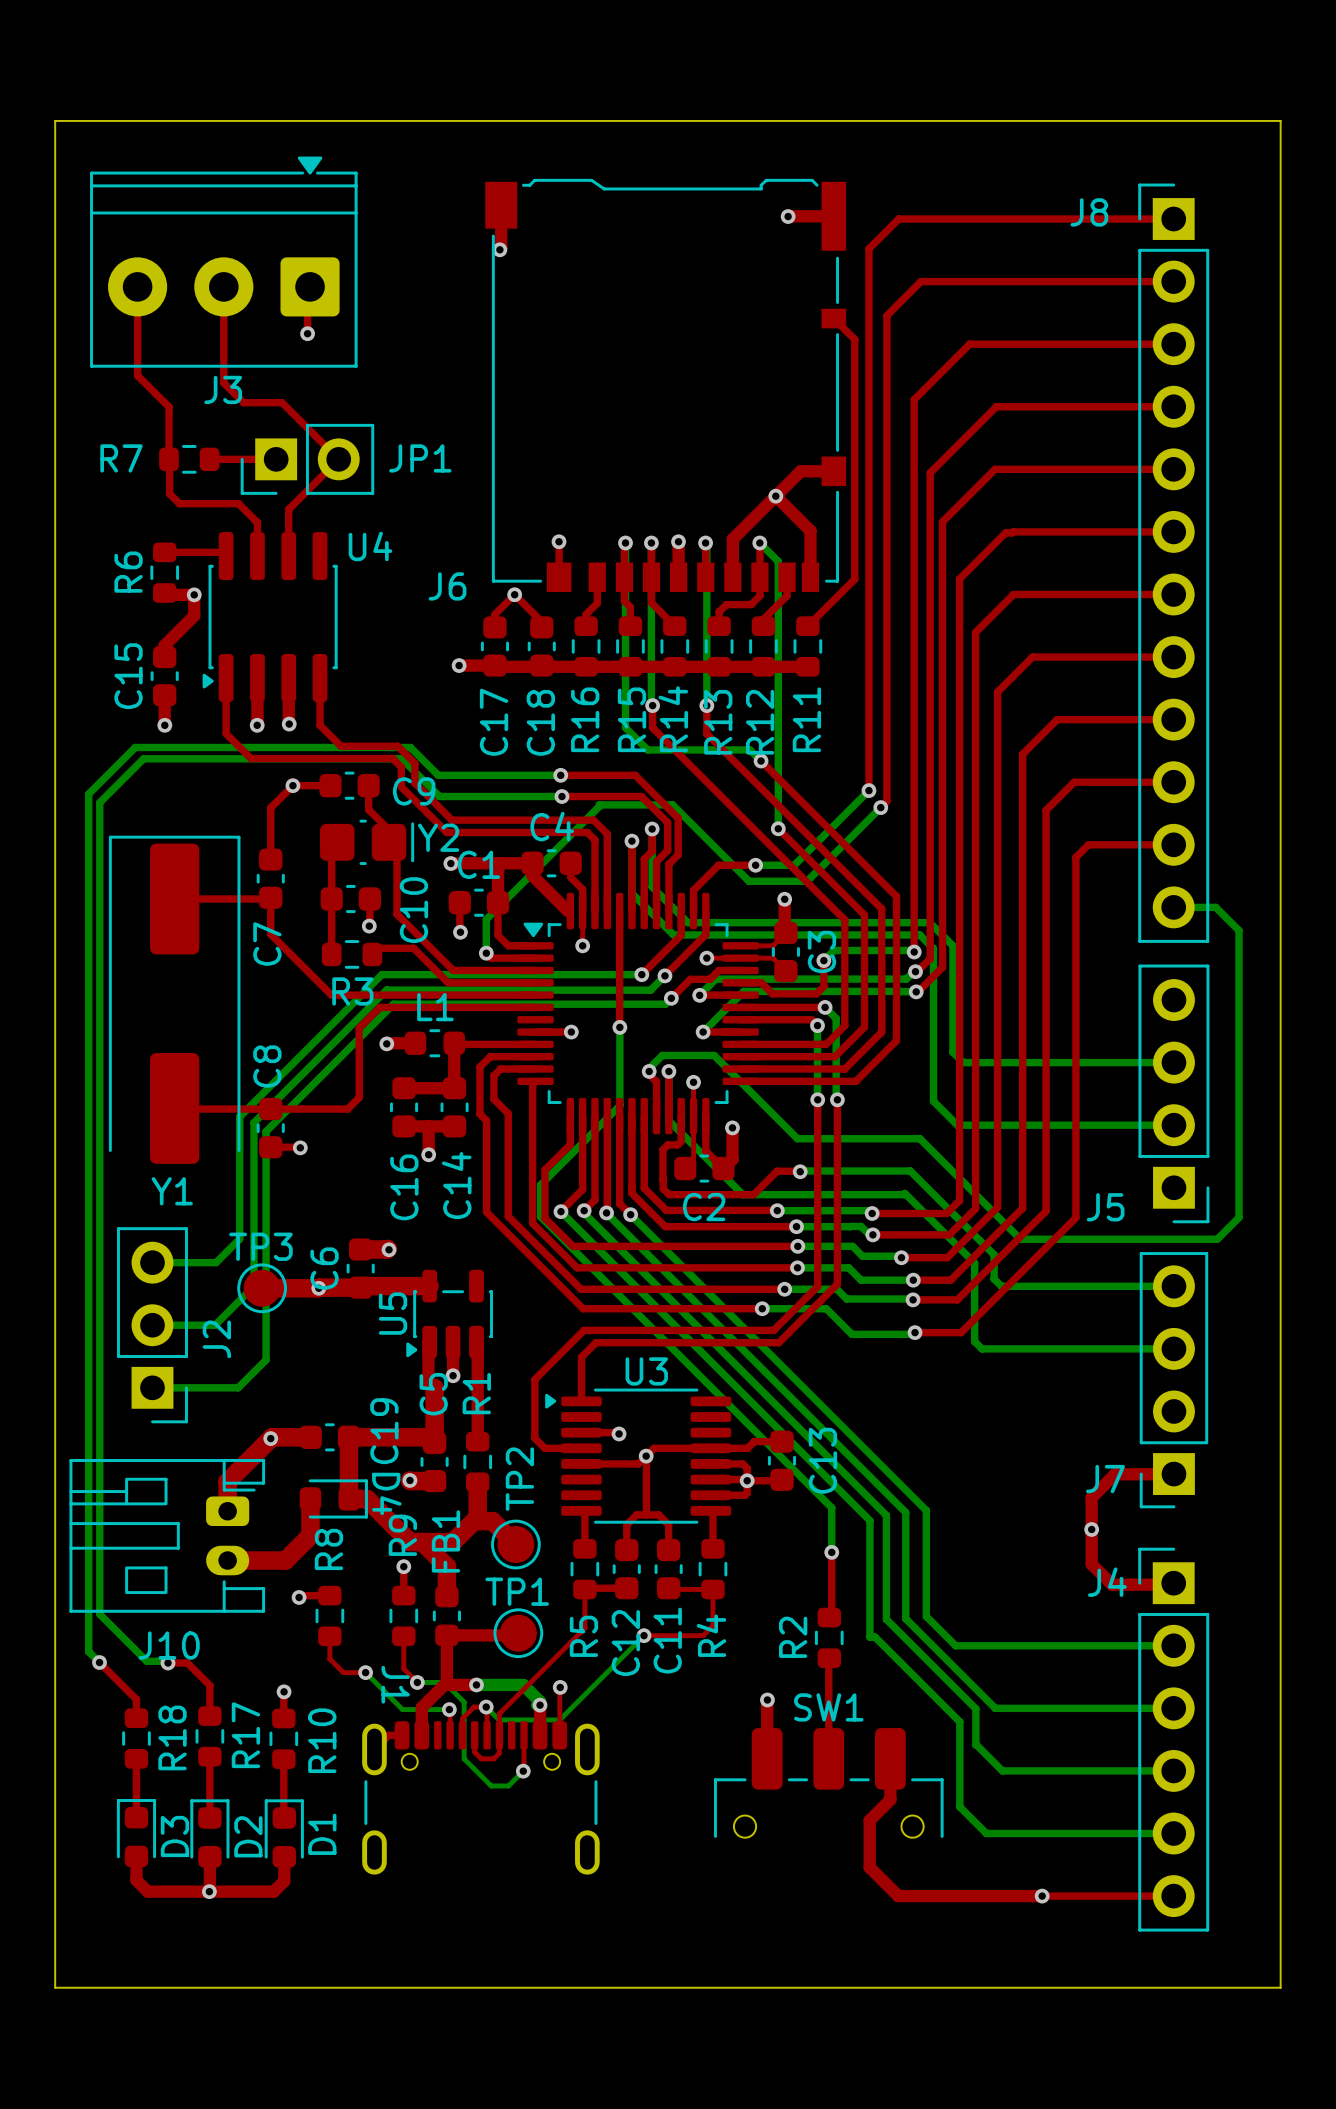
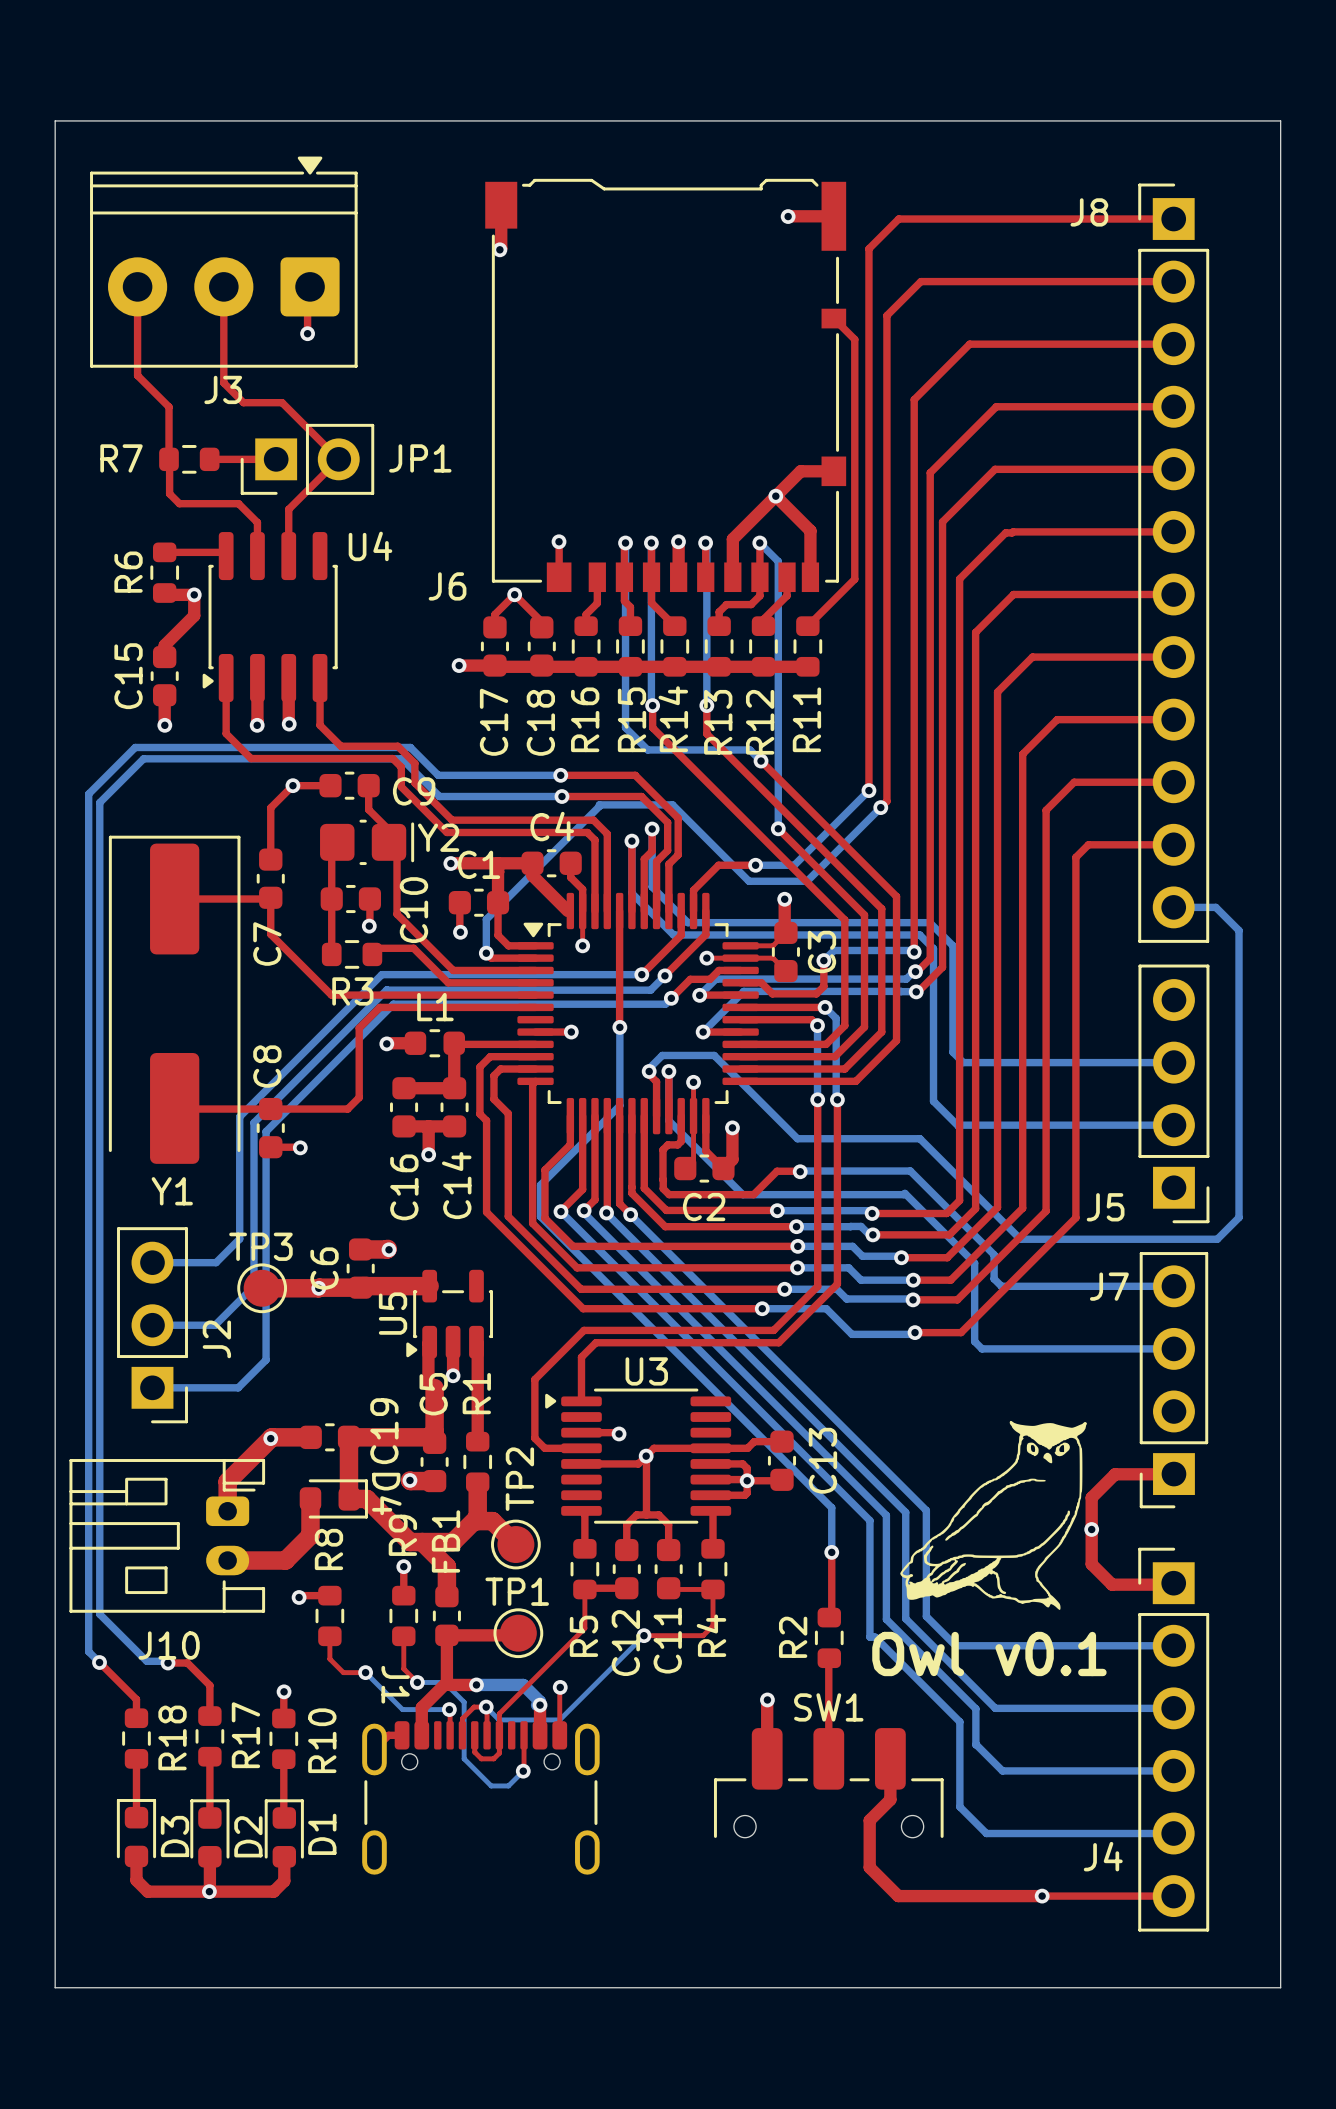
J7 name position: J7 (1105, 1479) -> J7 (1109, 1286)
Owl v0.1: none -> (993, 1515)
J4 name position: J4 (1107, 1582) -> J4 (1103, 1856)

